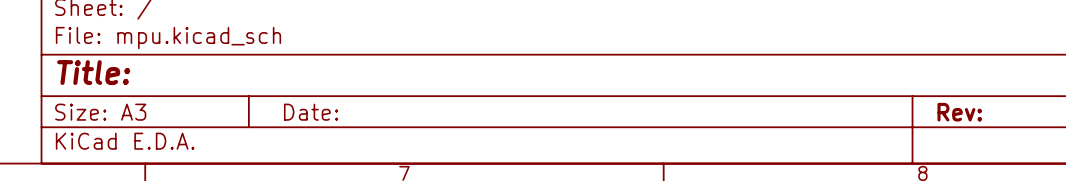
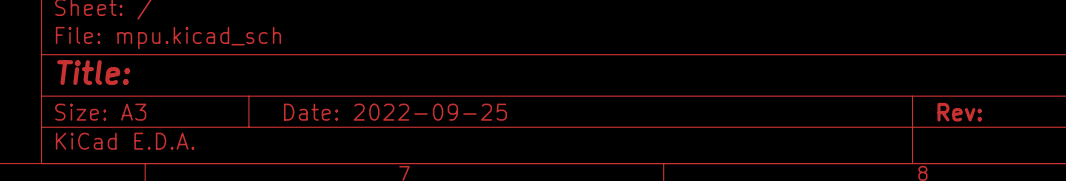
title block: Date: (311, 112) -> Date: 2022-09-25 (395, 112)

